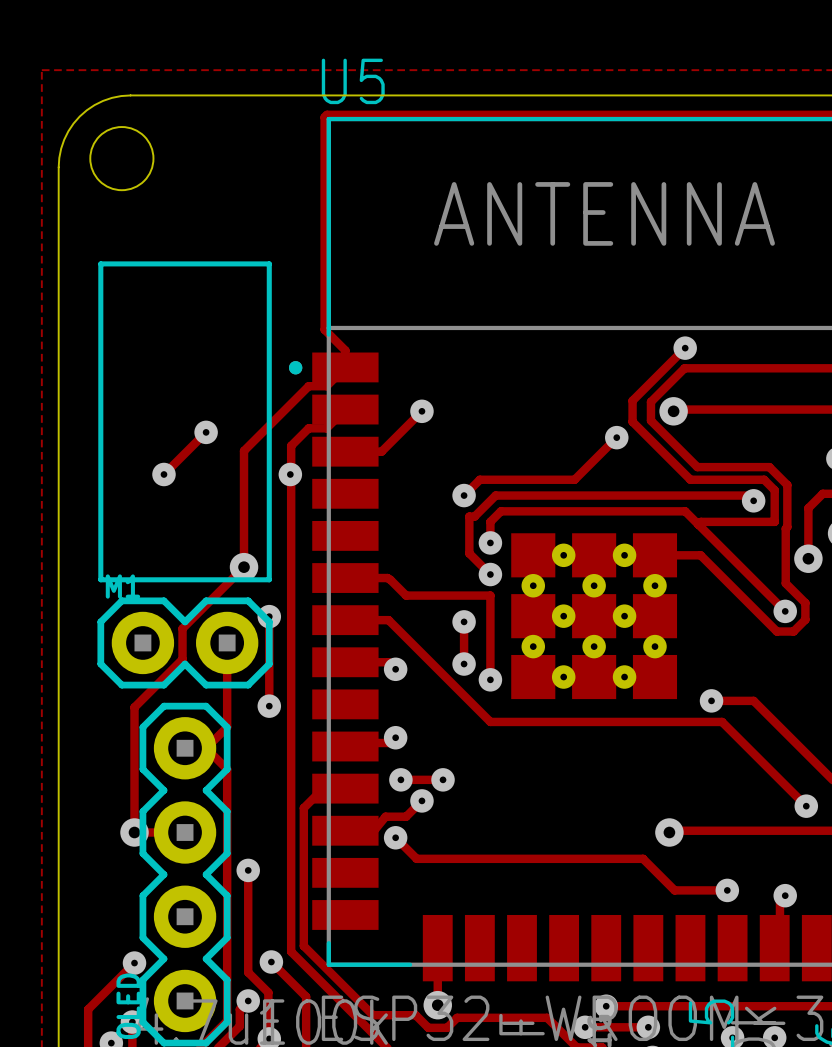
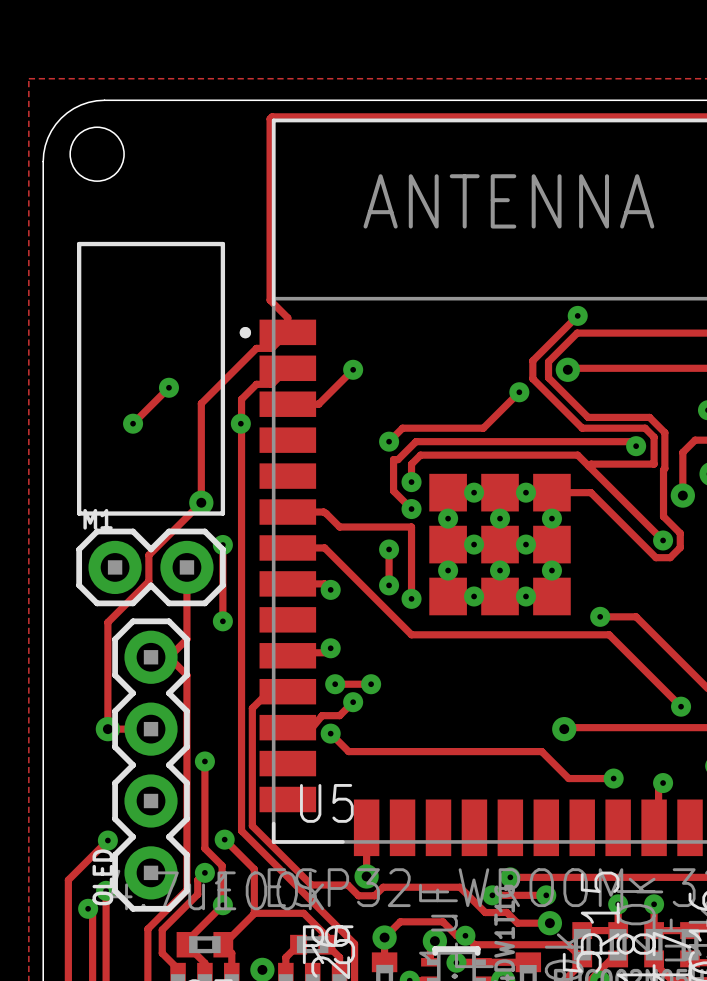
U5 name position: U5 (353, 81) -> U5 (326, 803)

